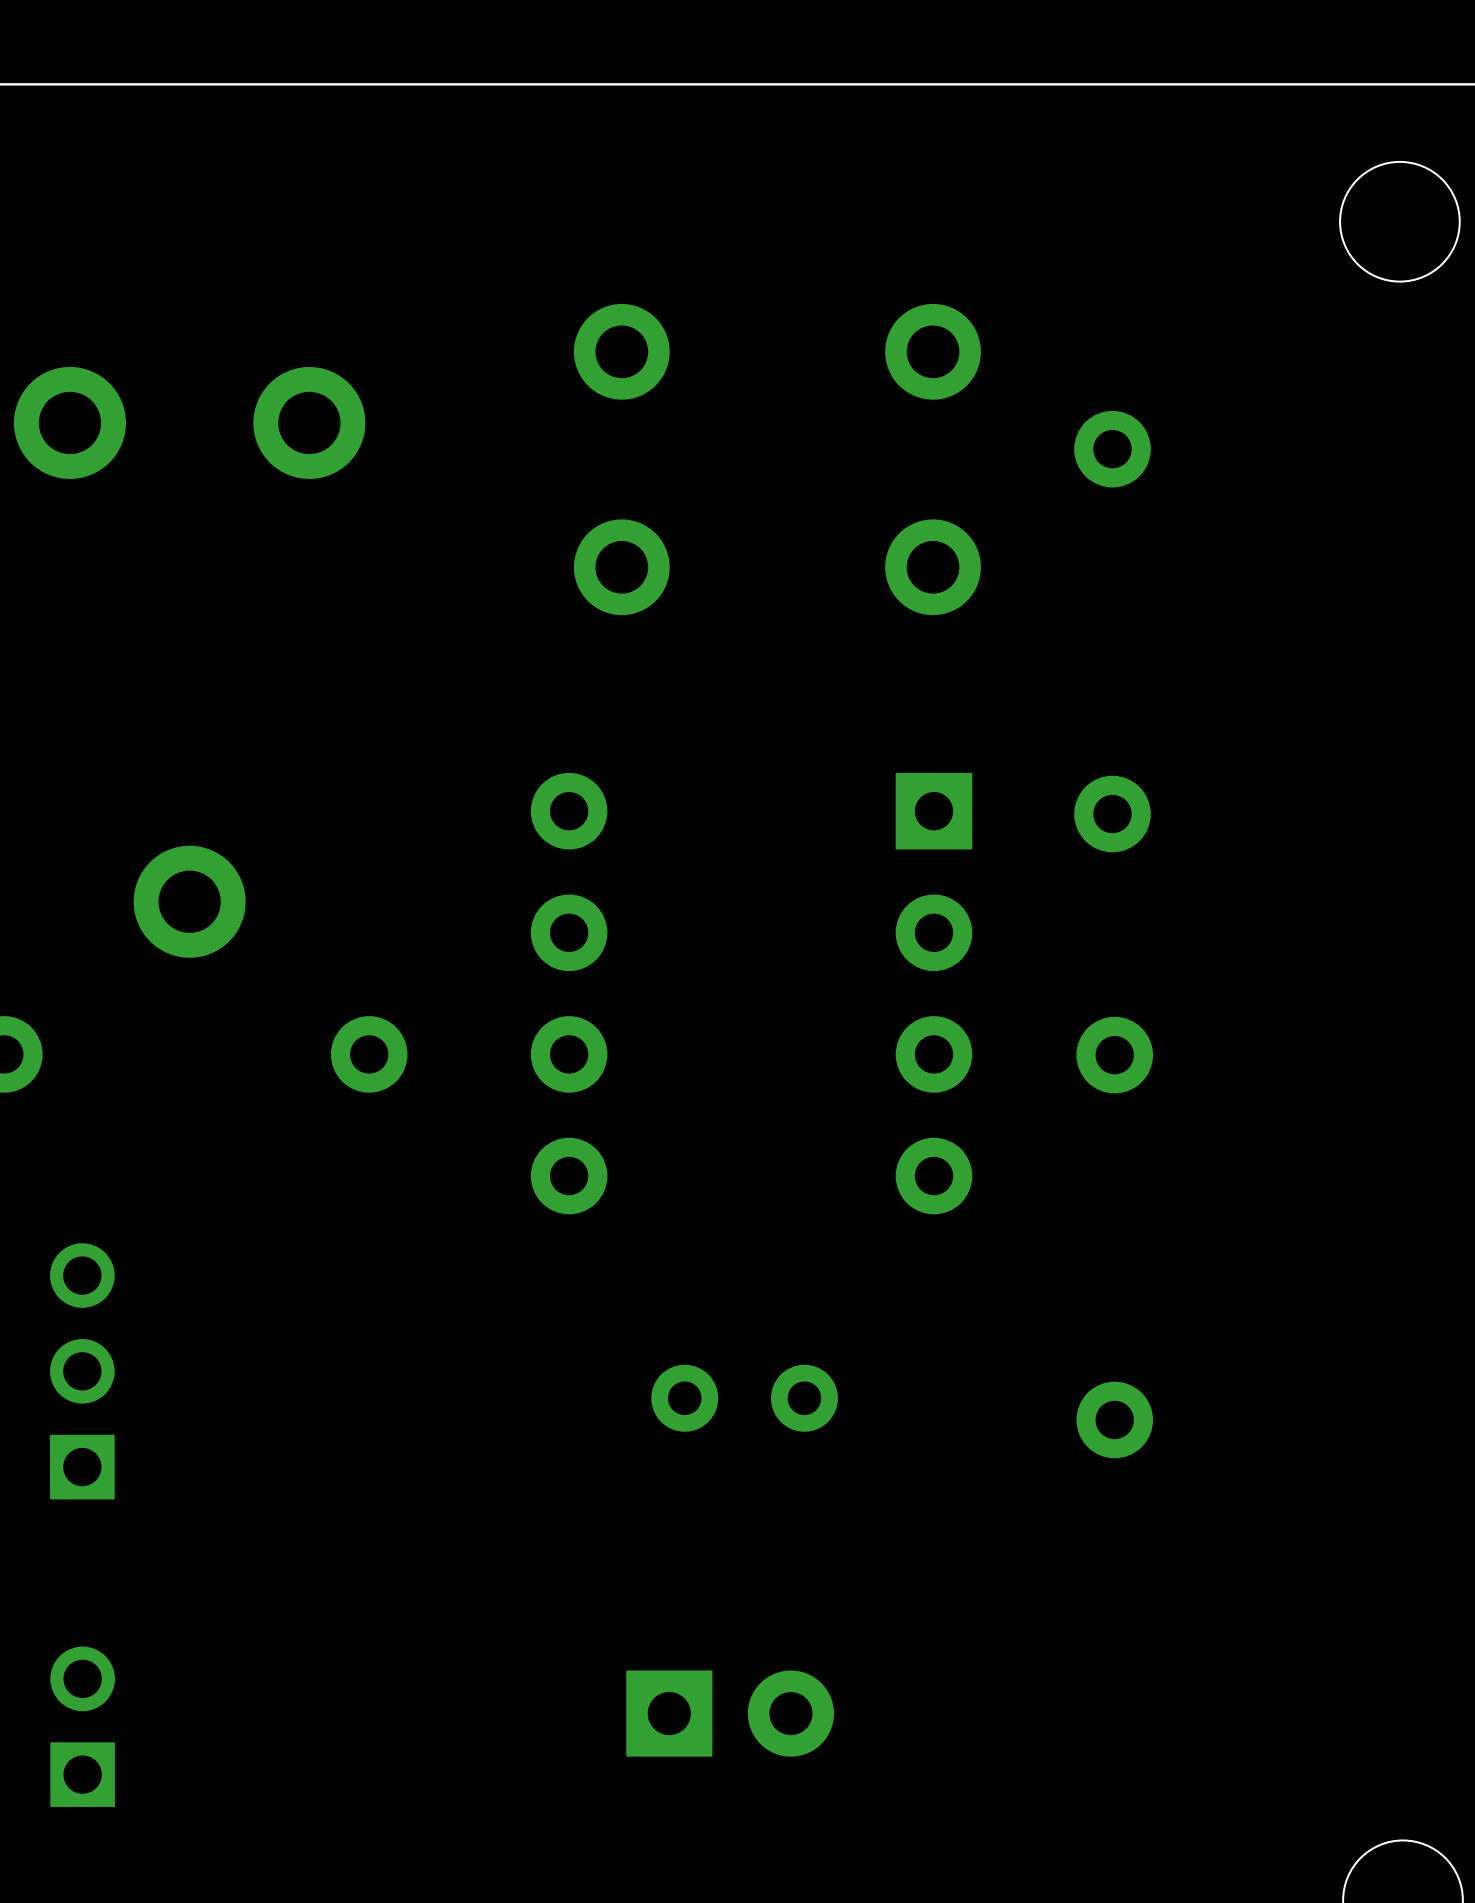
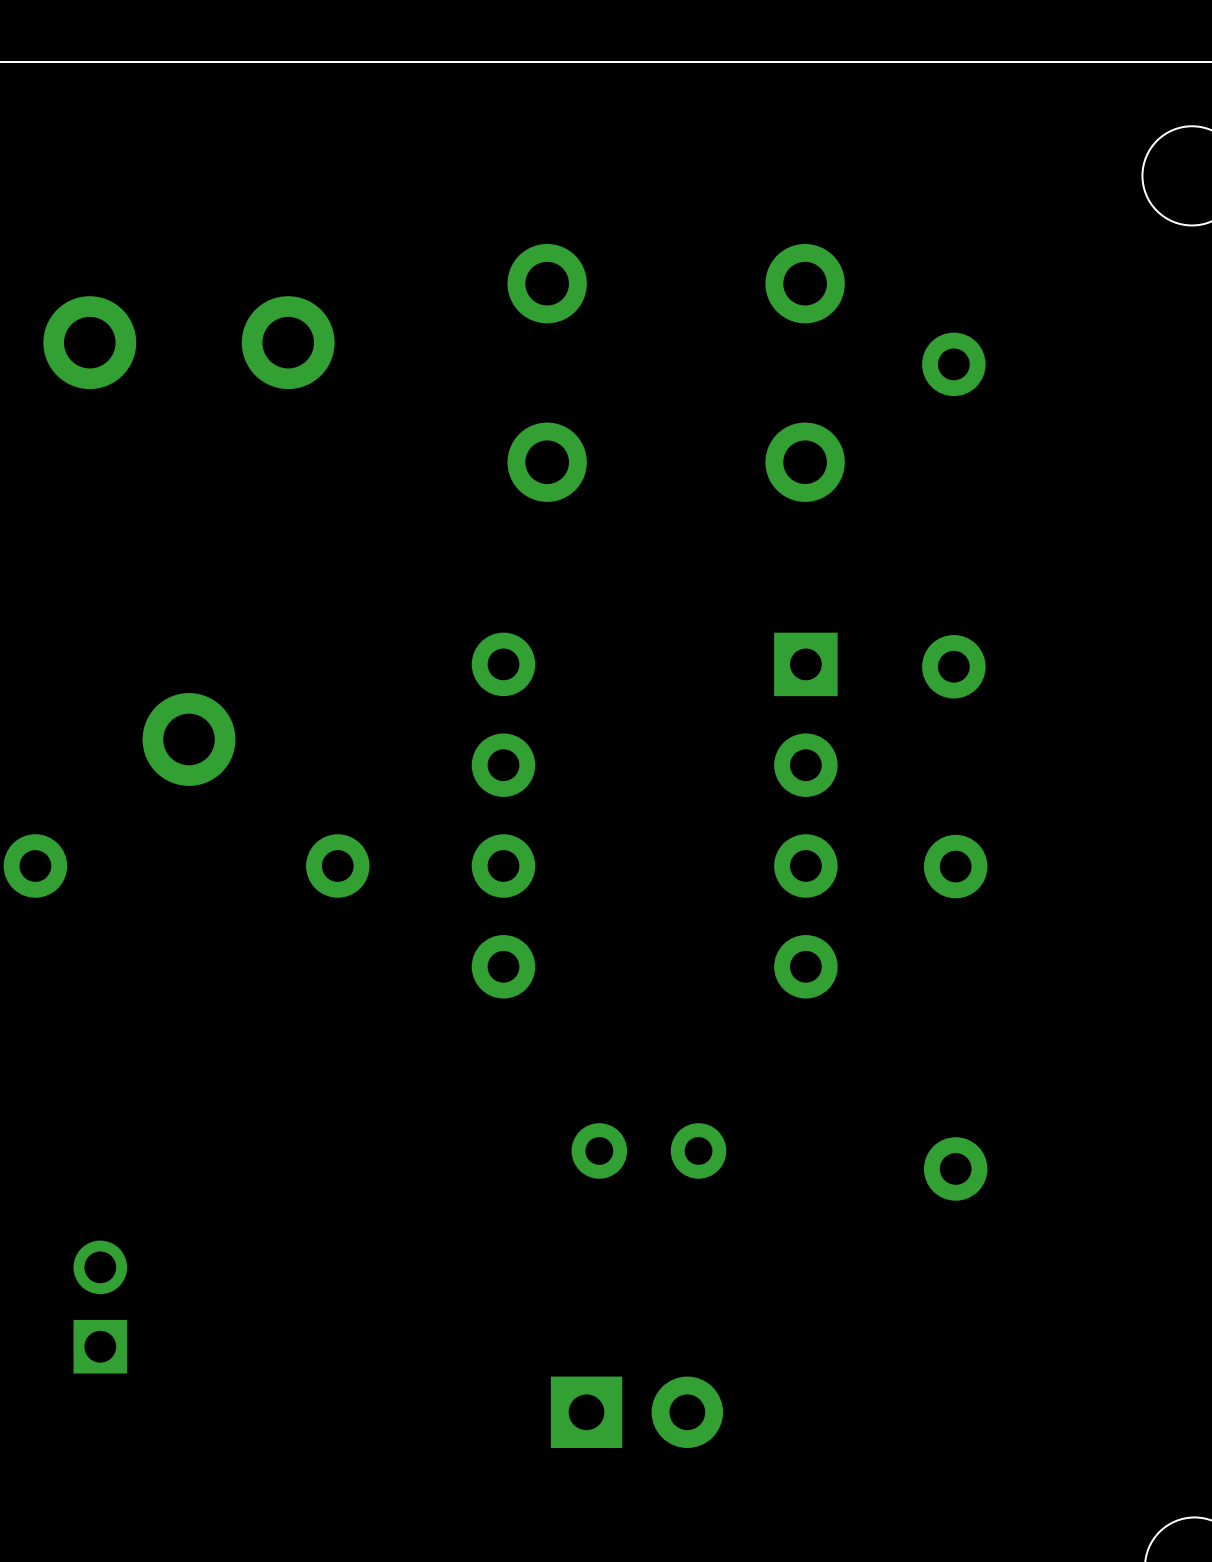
part: (82, 1371) -> none
part position: (82, 1726) -> (100, 1307)

